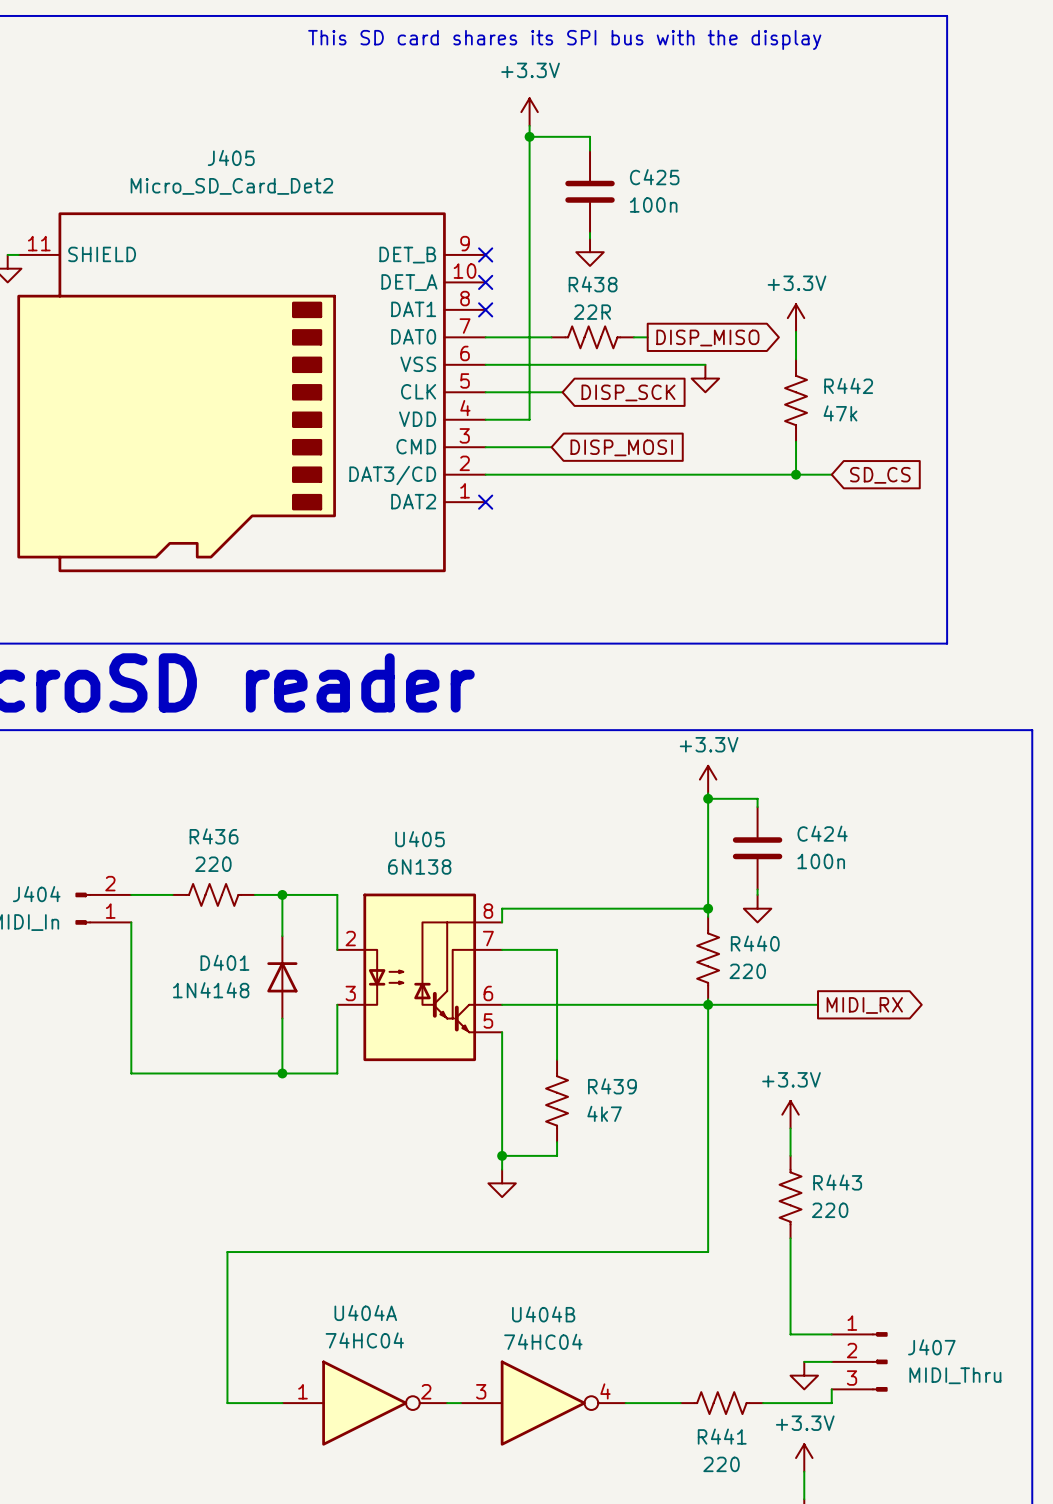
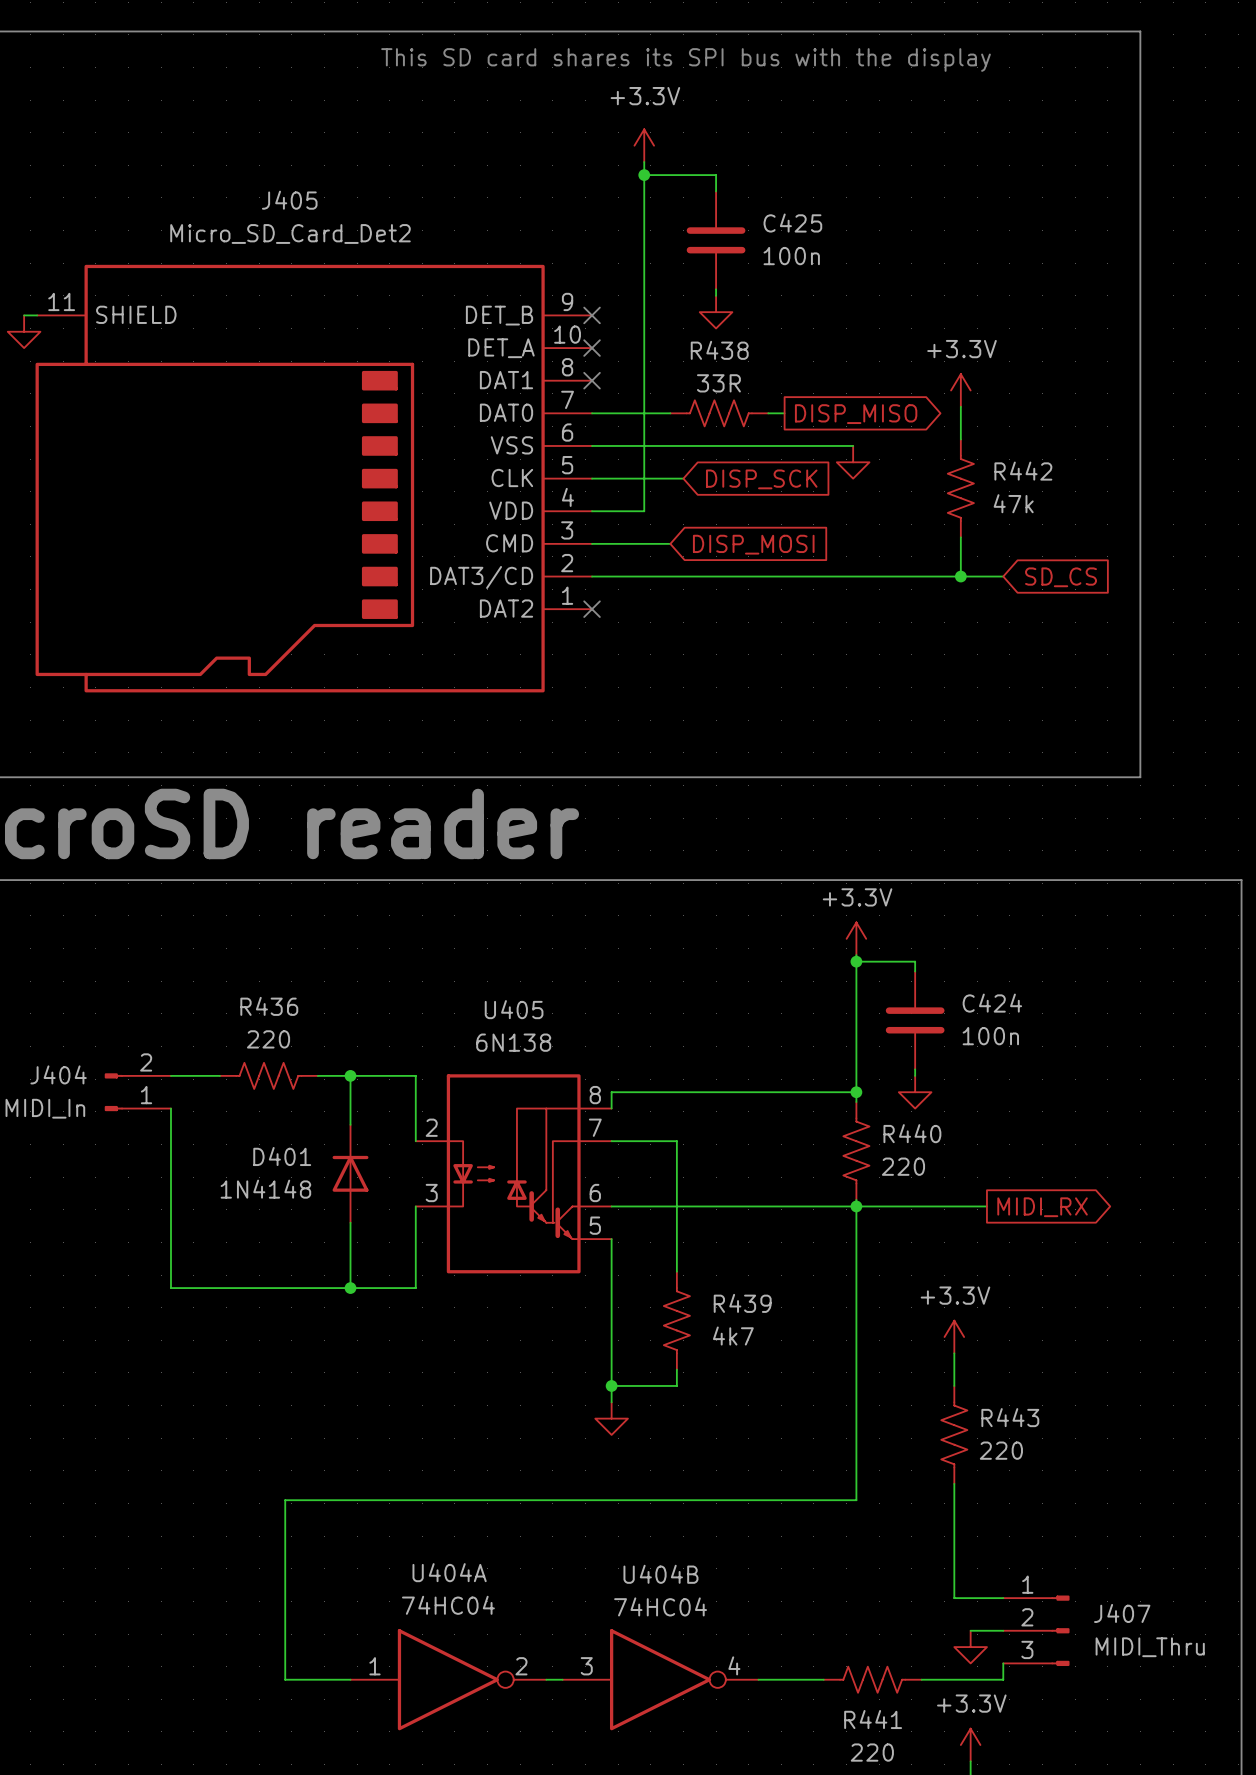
R438 value: 22R (592, 312) -> 33R (718, 383)

